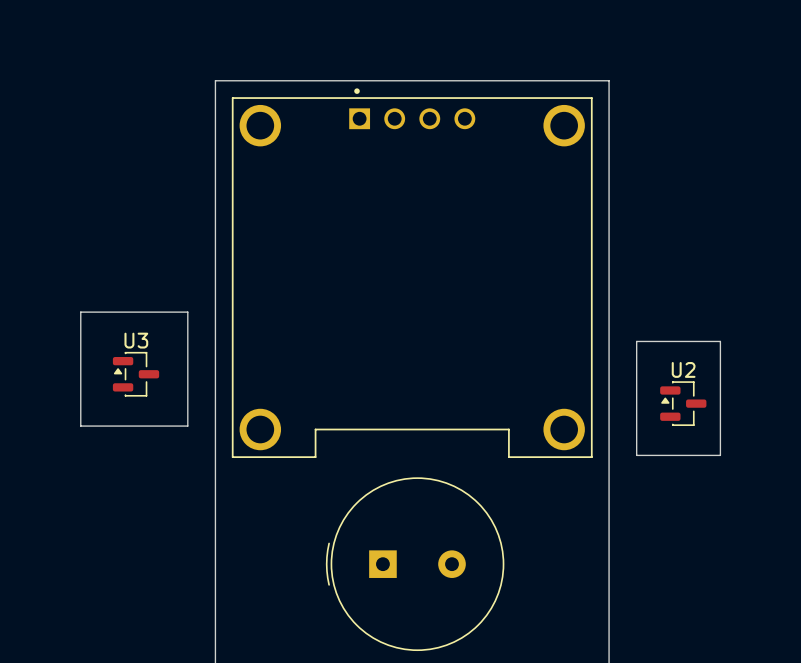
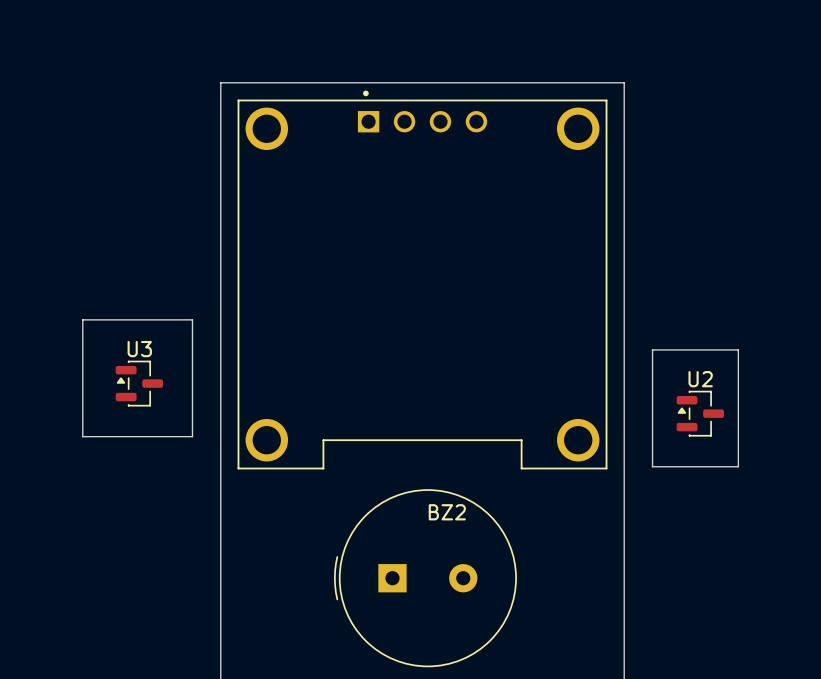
BZ2 name: none -> BZ2 (447, 512)

